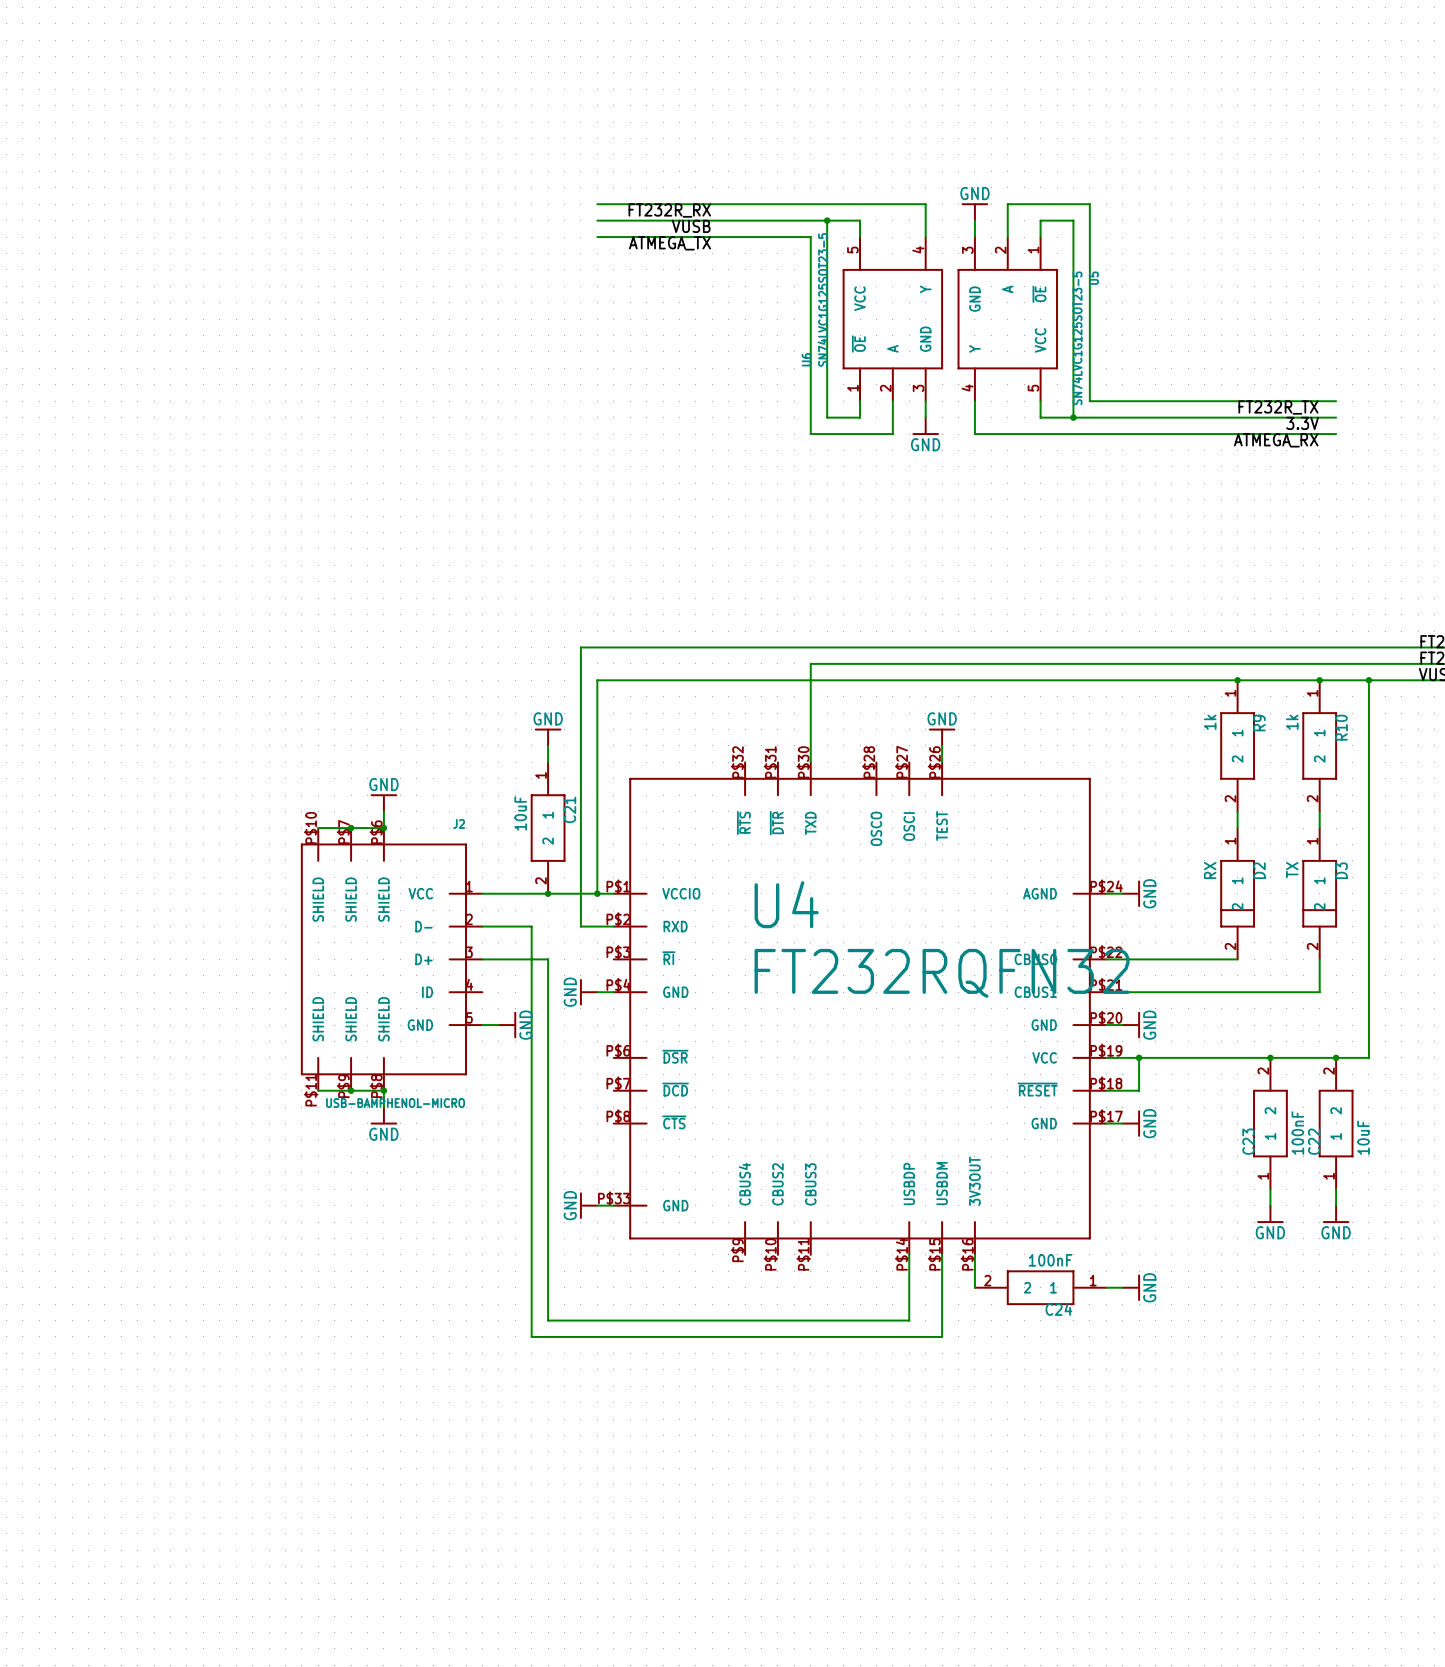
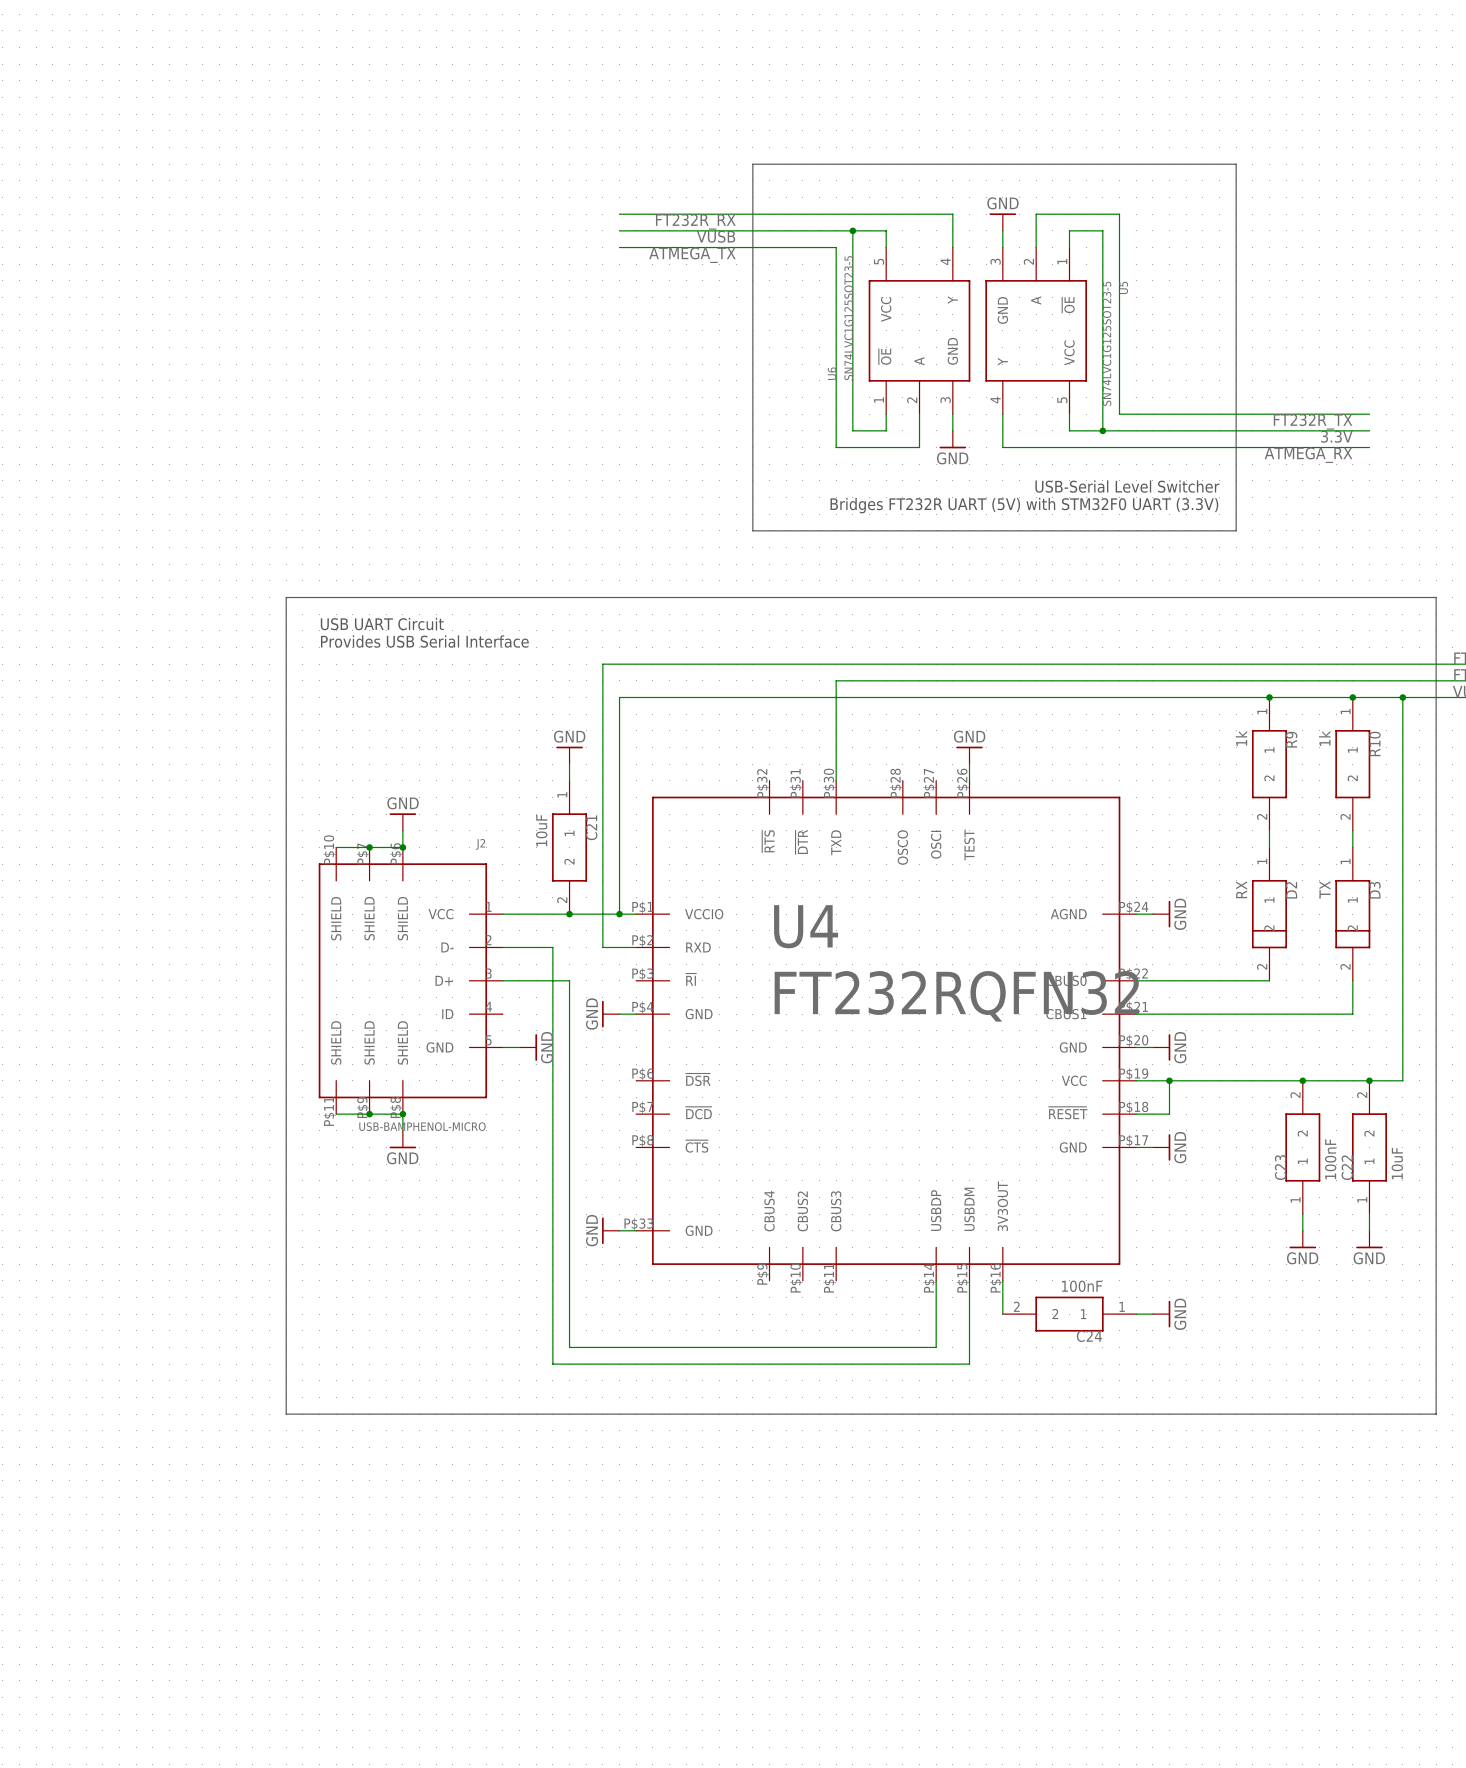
line: none -> (752, 164) (1236, 164) (1236, 530) (752, 530) (752, 164)
text: none -> USB-Serial Level Switcher (1127, 486)
text: none -> Bridges FT232R UART (5V) with STM32F0 UART (3.3V) (1024, 505)
line: none -> (286, 597) (286, 1414) (1436, 1414) (1436, 597) (286, 597)
text: none -> USB UART Circuit (382, 624)
text: none -> Provides USB Serial Interface (424, 641)

